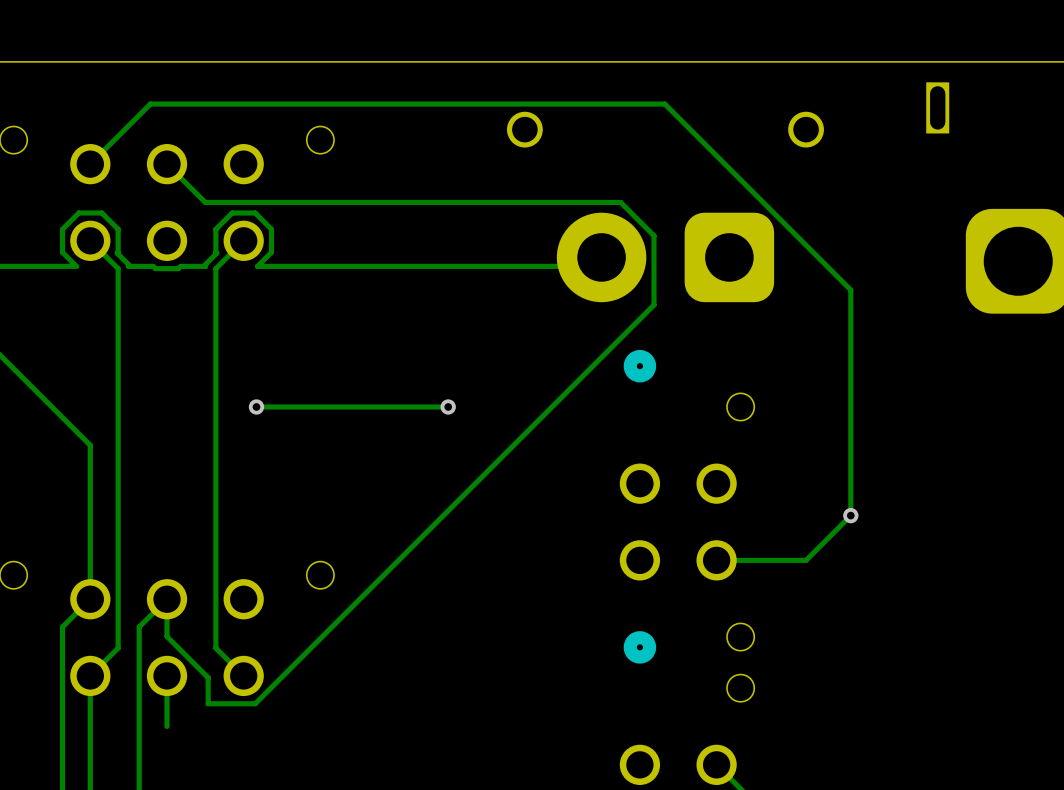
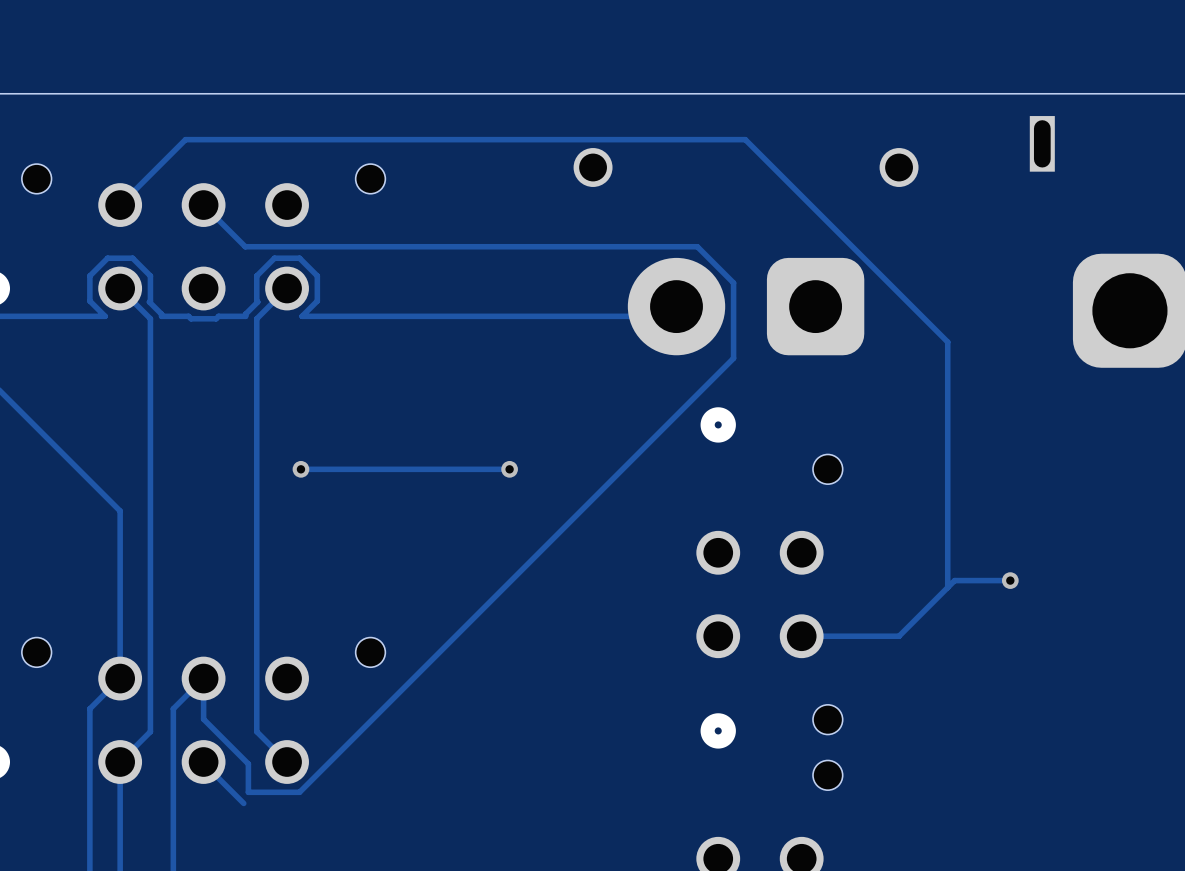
track: none -> (1010, 580) (954, 580) (947, 587)
via position: (850, 515) -> (1010, 580)
track: (167, 677) (167, 726) -> (203, 763) (243, 803)

